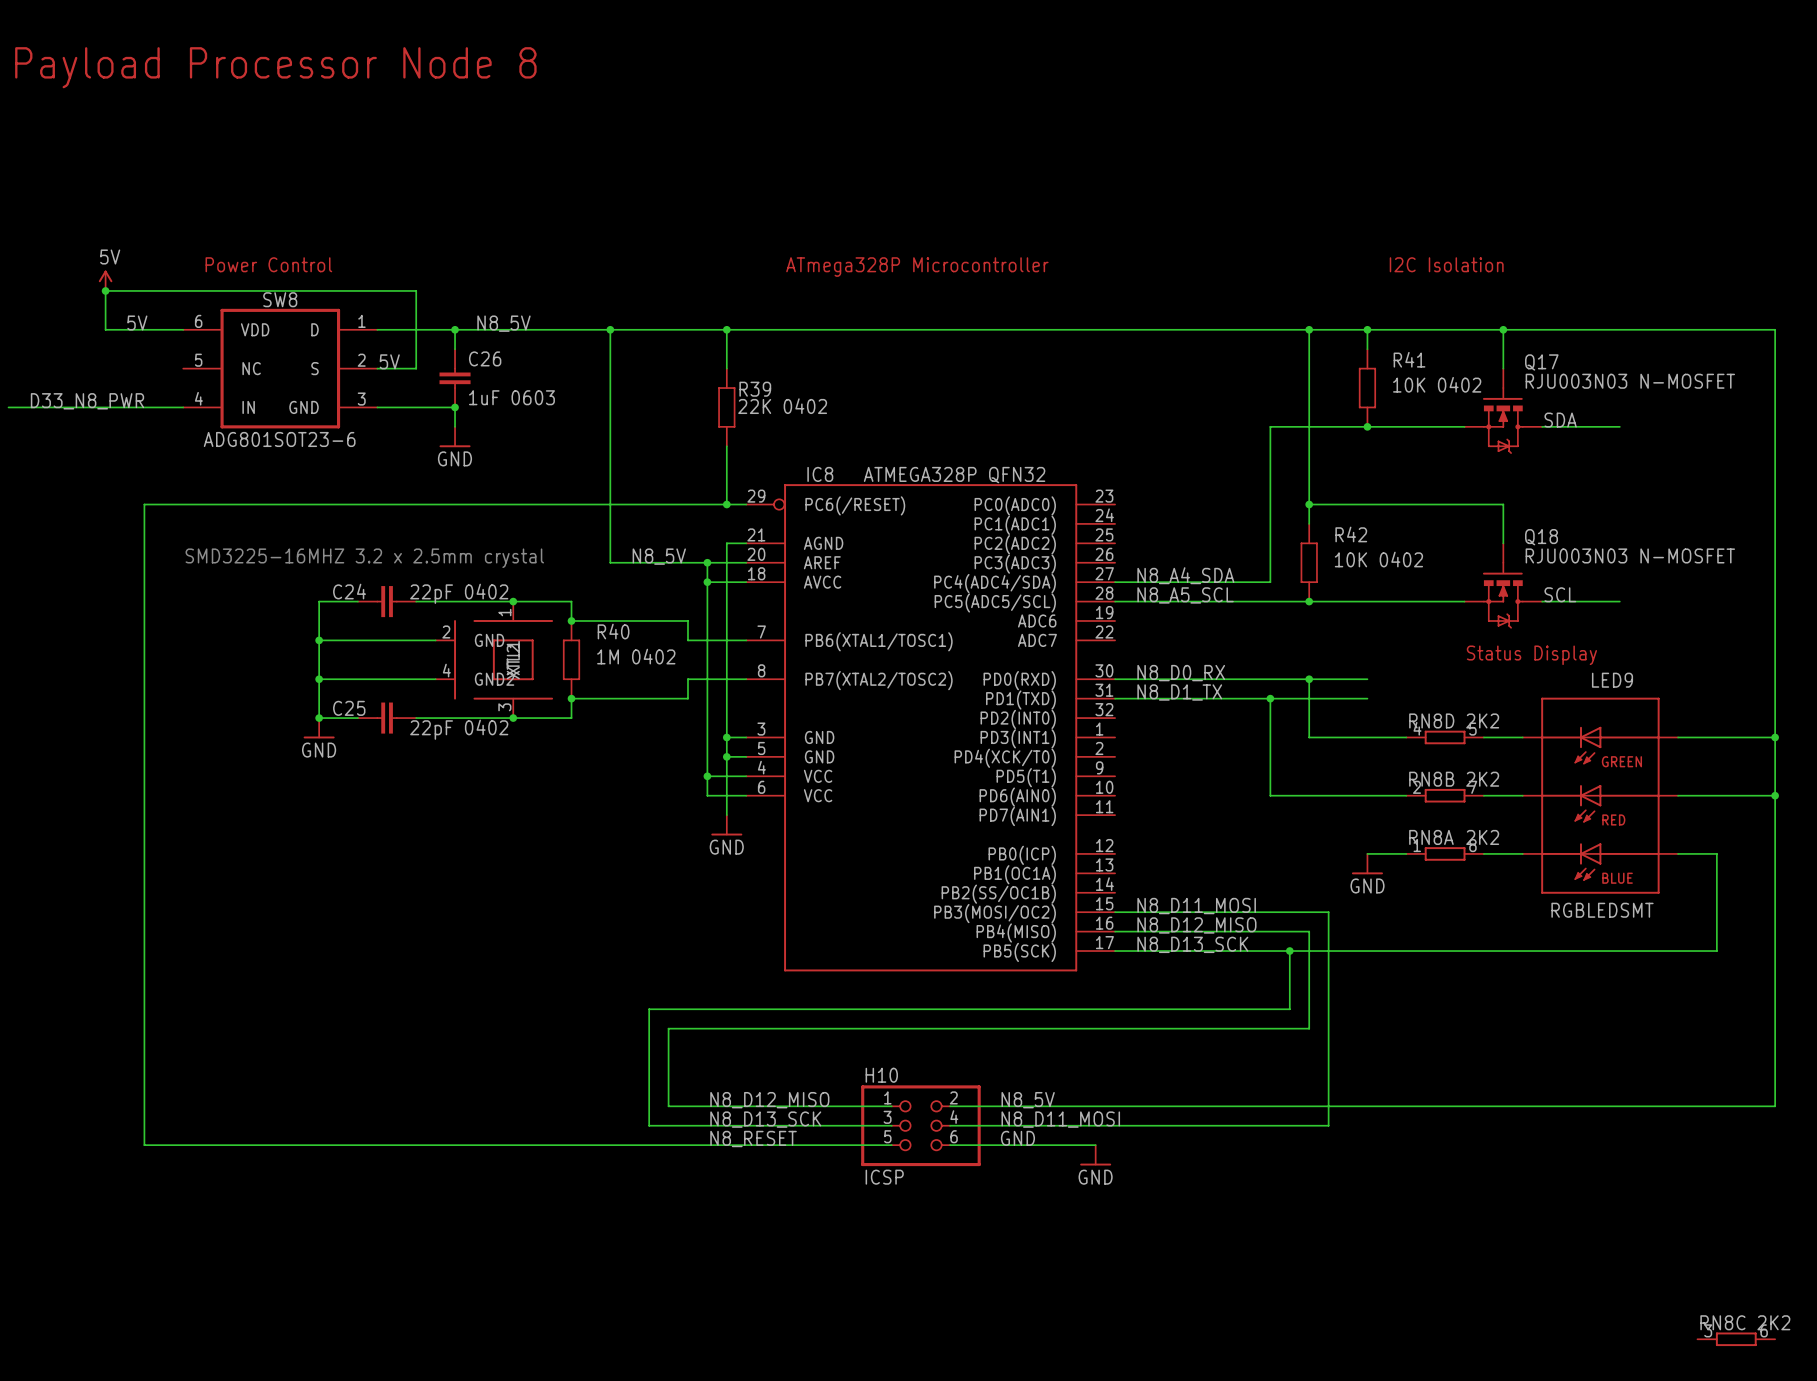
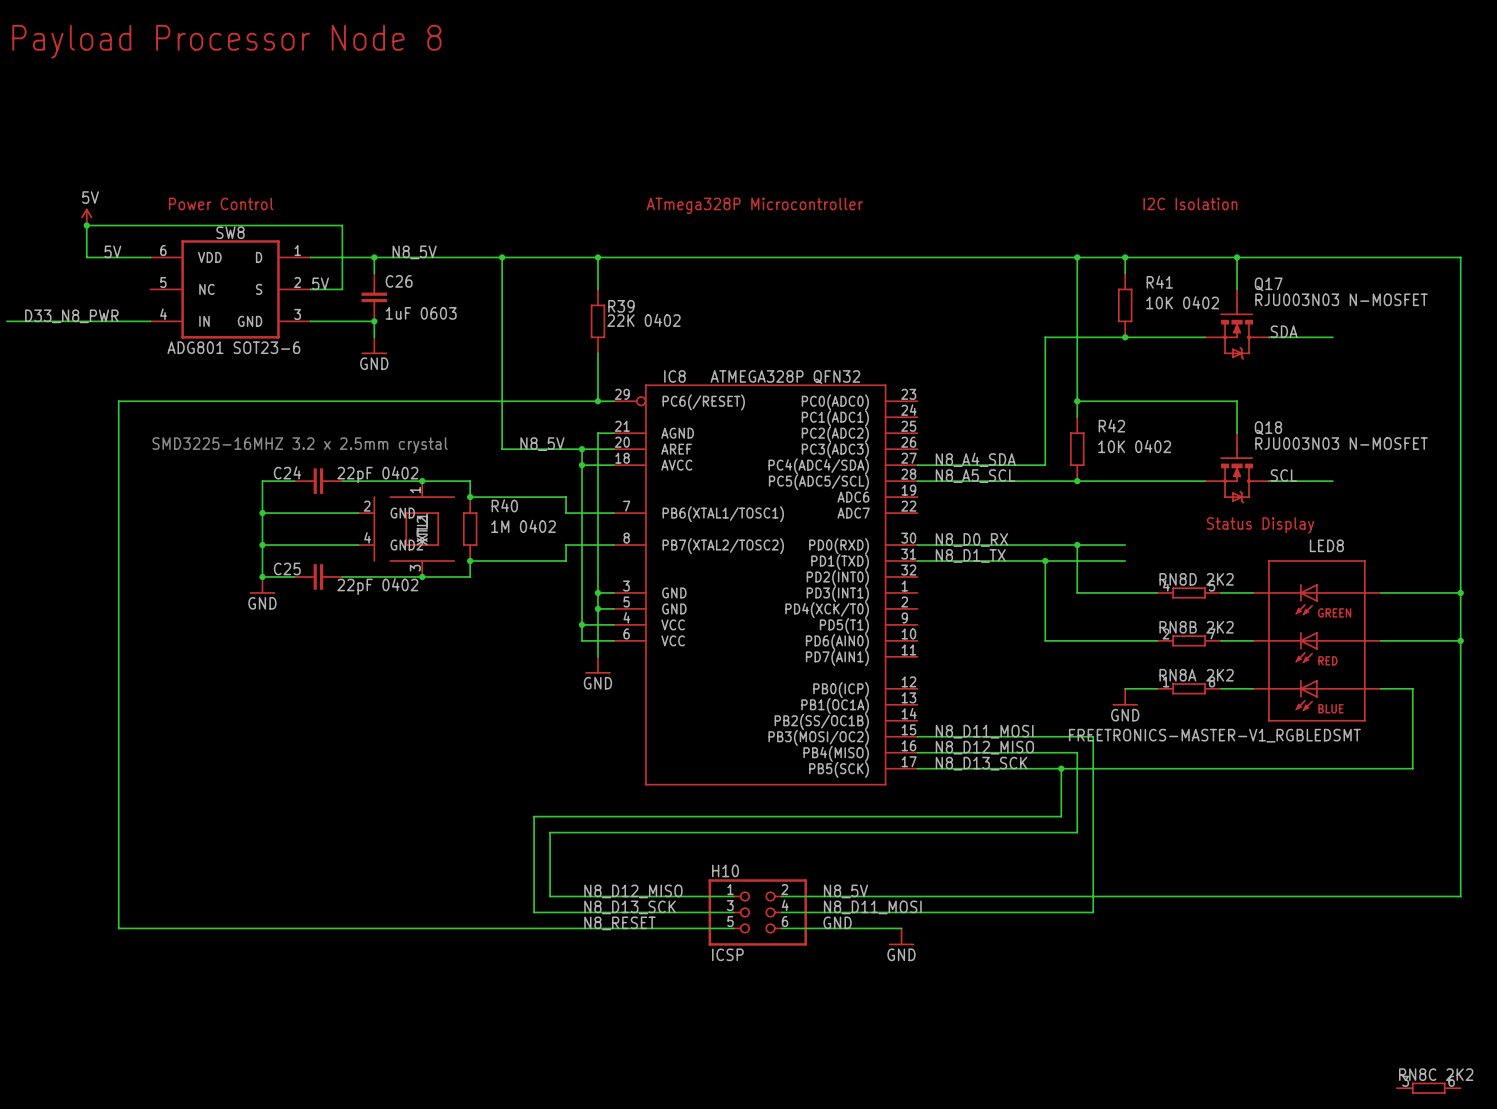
SW8 value: ADG801SOT23-6 (279, 439) -> ADG801 SOT23-6 (233, 347)
LED9 name: LED9 (1612, 680) -> LED8 (1326, 545)
LED9 value: RGBLEDSMT (1602, 910) -> FREETRONICS-MASTER-V1_RGBLEDSMT (1214, 735)

